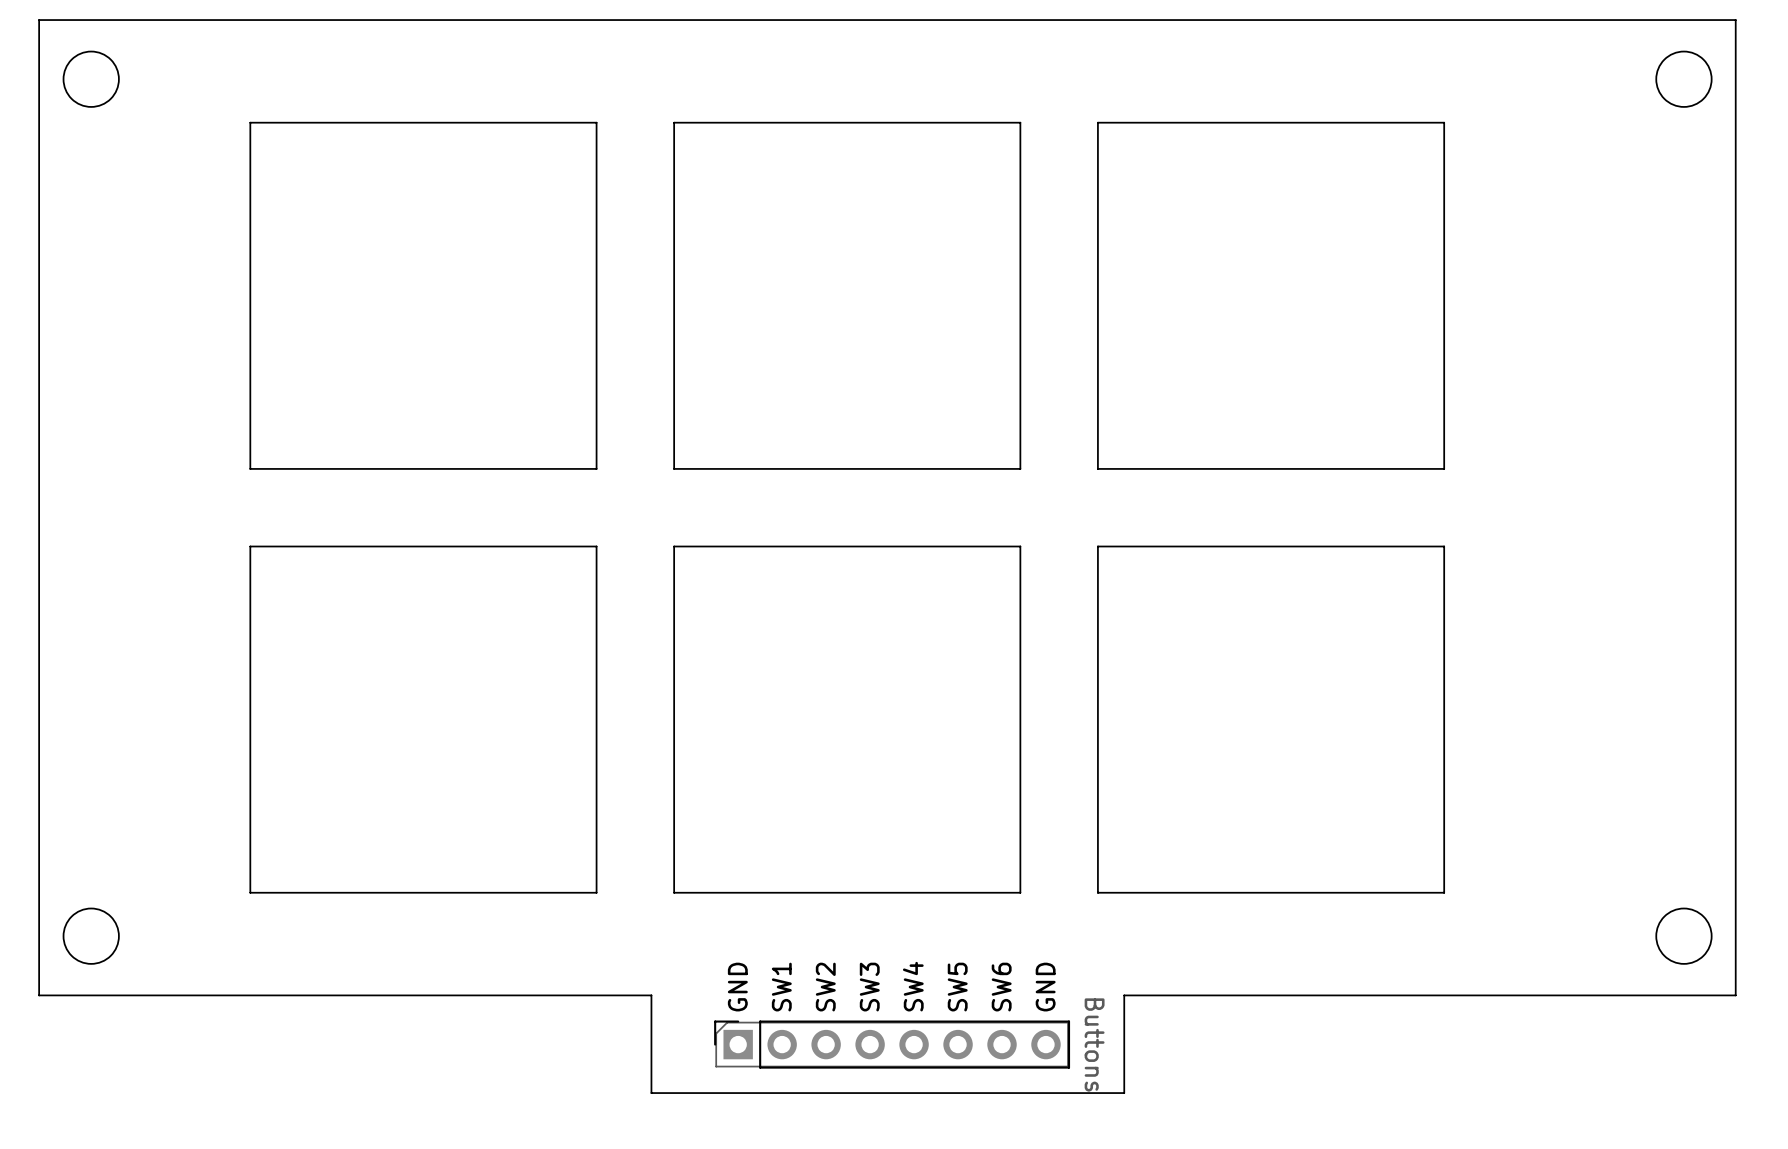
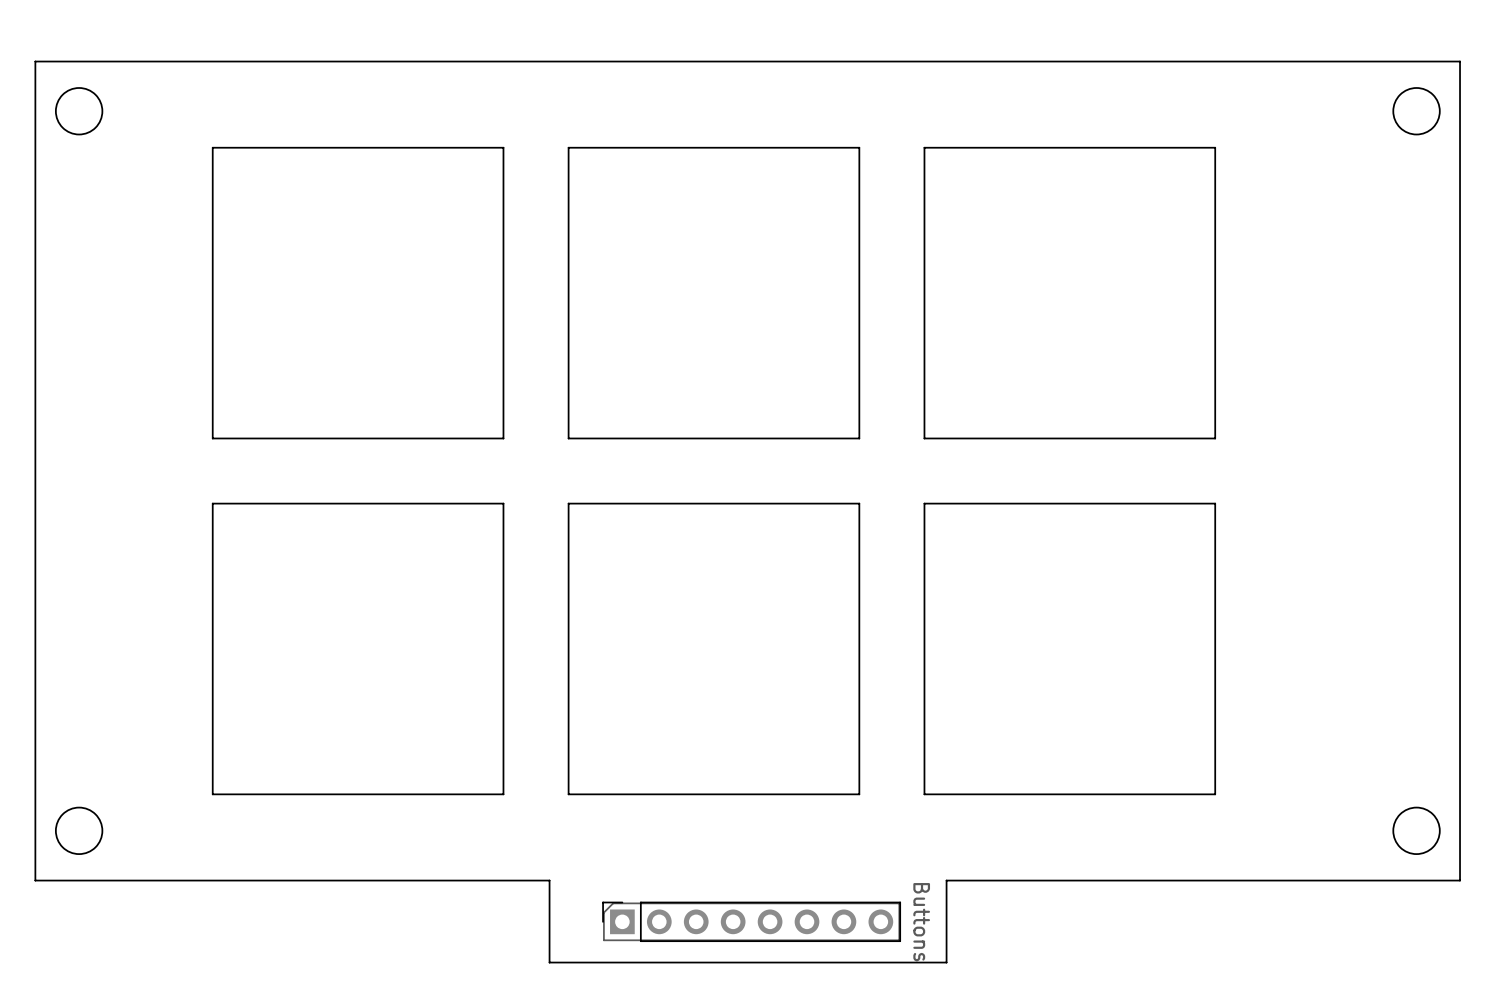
text: SW4 (913, 986) -> none
text: GND (737, 987) -> none
text: SW1 (781, 987) -> none
text: SW2 (825, 987) -> none
text: SW3 (869, 987) -> none
text: SW5 (957, 987) -> none
text: SW6 (1001, 987) -> none
text: GND (1045, 987) -> none

